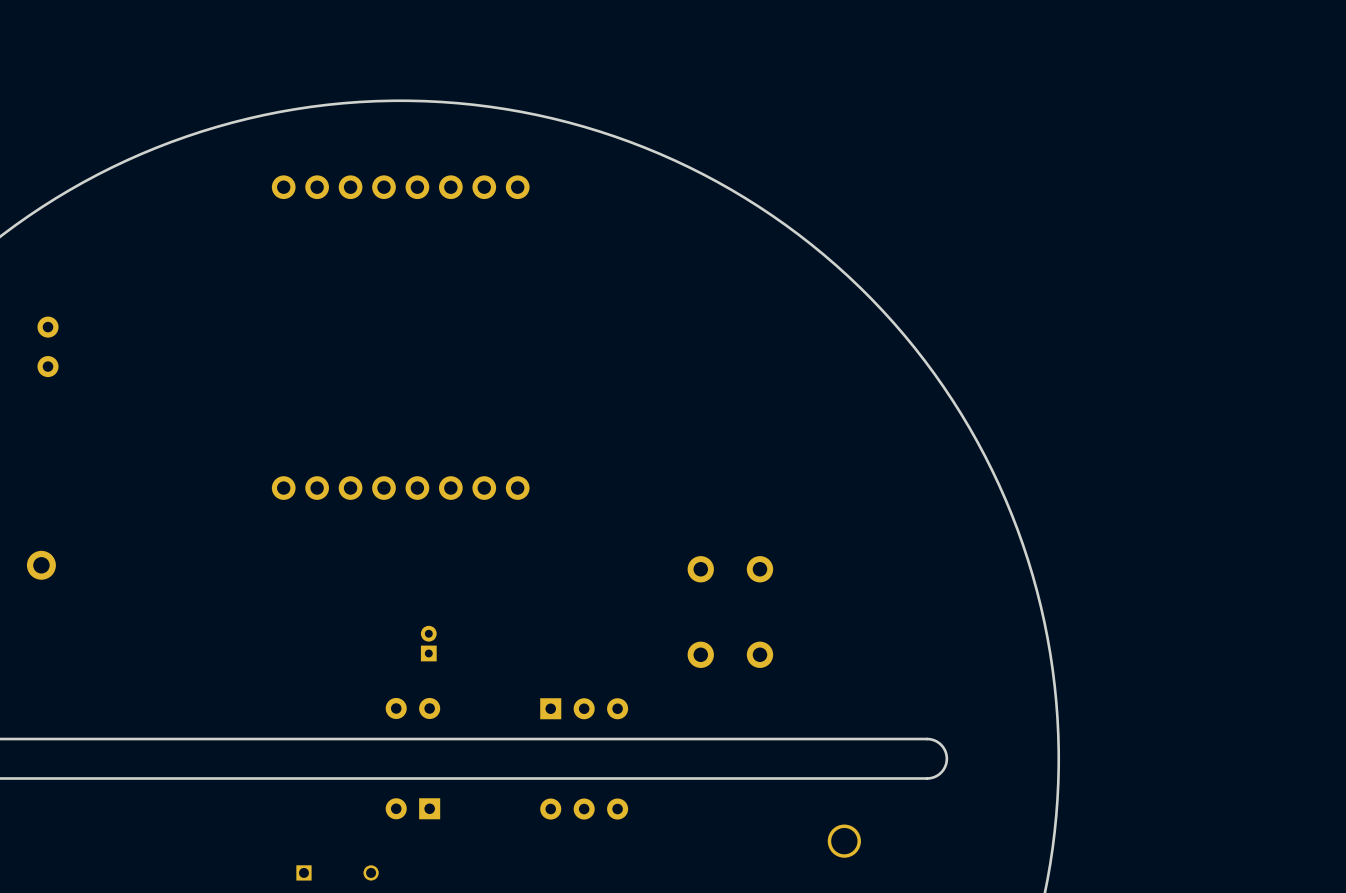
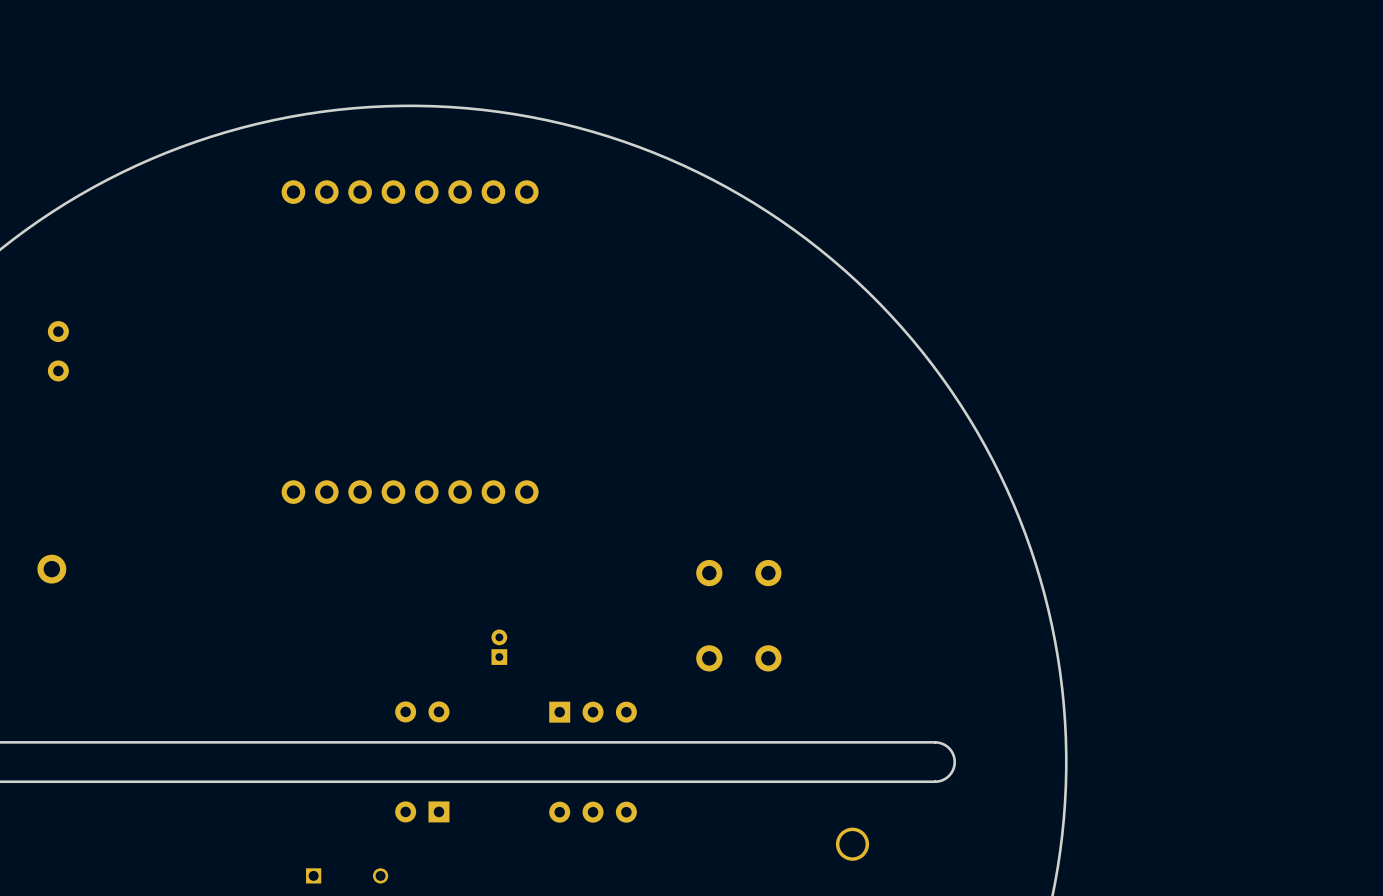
part position: (428, 643) -> (499, 647)

